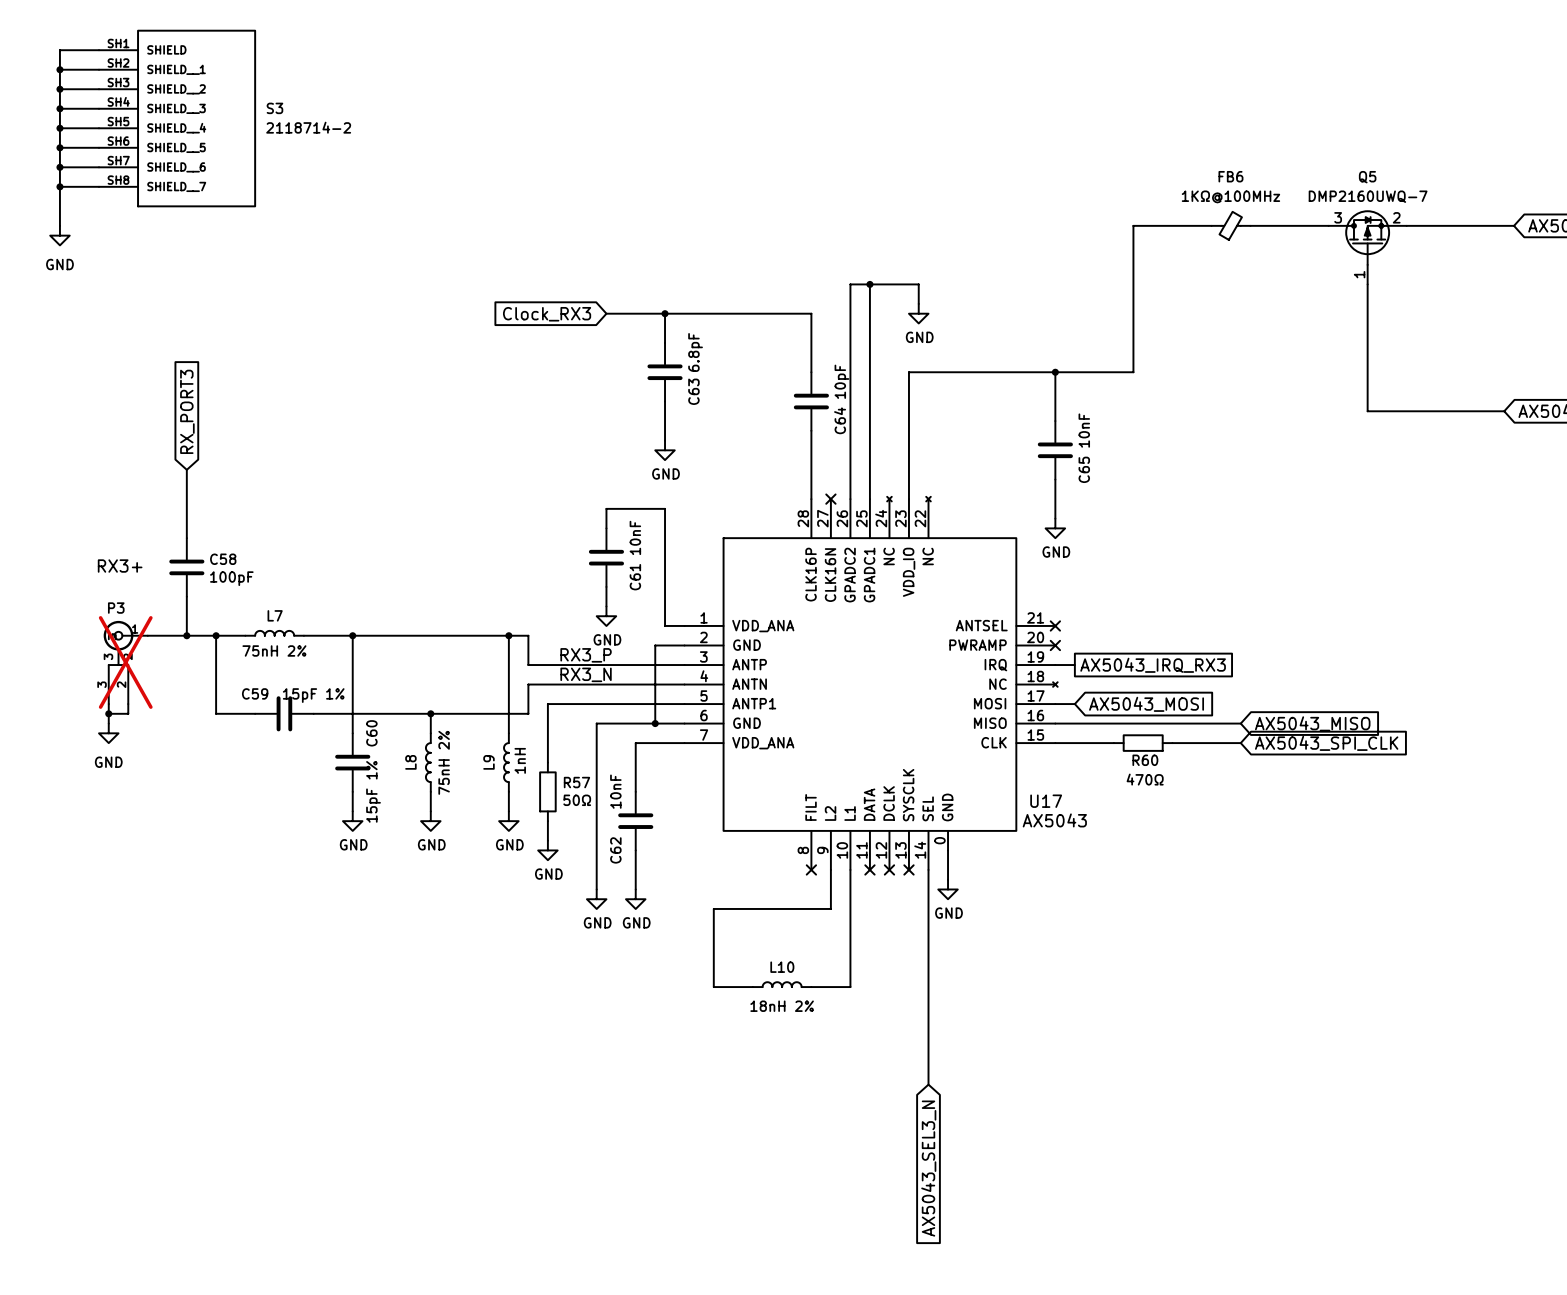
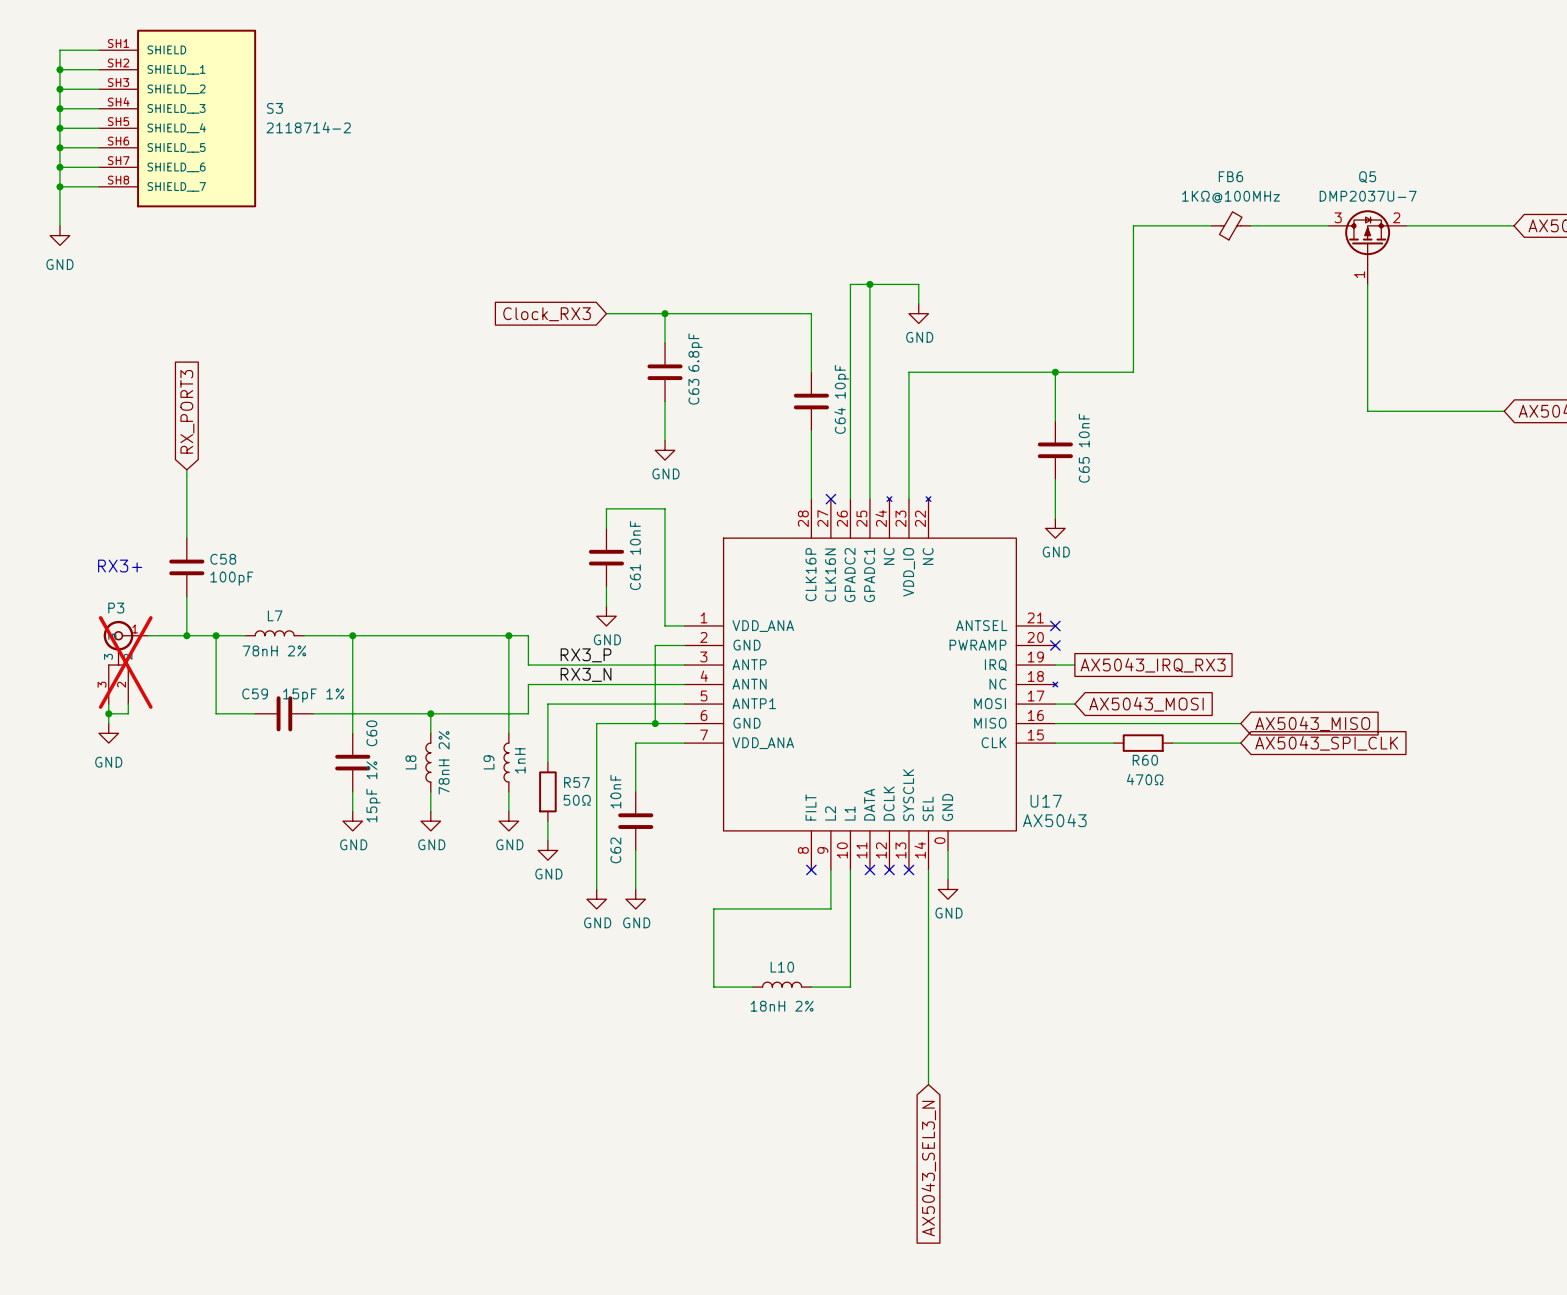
Q5 value: DMP2160UWQ-7 (1368, 196) -> DMP2037U-7 (1368, 196)
L7 value: 75nH 2% (274, 650) -> 78nH 2% (274, 650)
L8 value: 75nH 2% (444, 762) -> 78nH 2% (444, 762)

